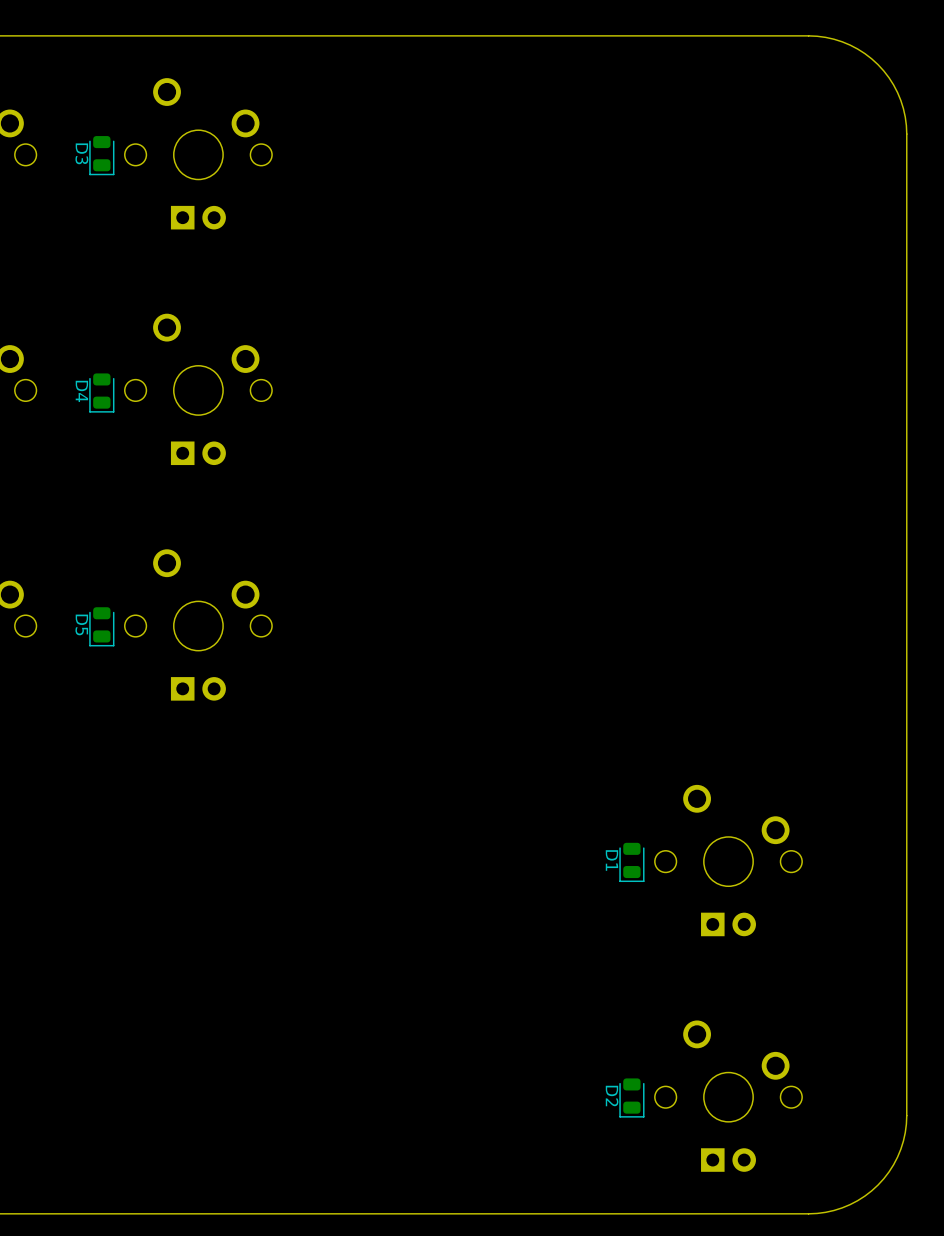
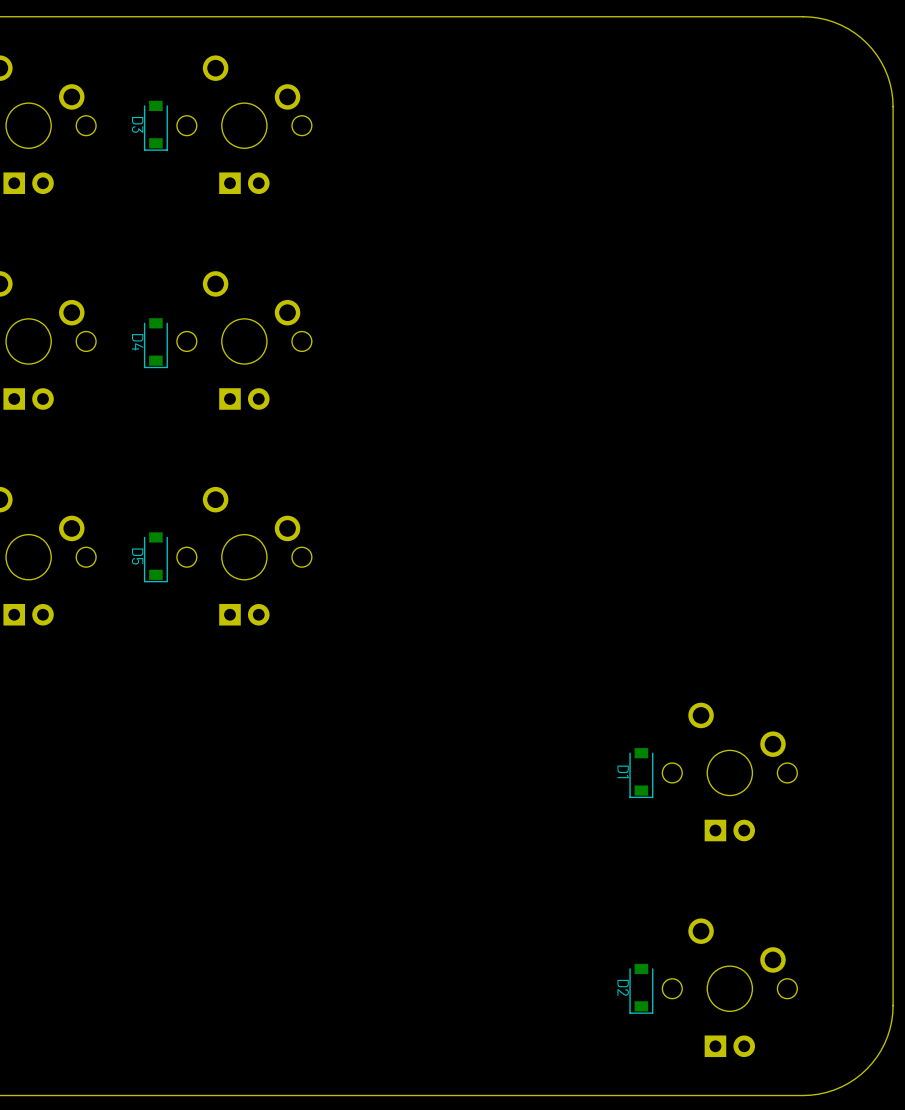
D3 footprint: [89, 136, 115, 176] -> [143, 100, 168, 151]
D4 footprint: [89, 373, 115, 413] -> [143, 318, 168, 369]
D5 footprint: [89, 607, 115, 647] -> [143, 532, 168, 583]
D1 footprint: [619, 842, 645, 883] -> [629, 748, 654, 799]
D2 footprint: [619, 1078, 645, 1118] -> [629, 963, 654, 1014]

